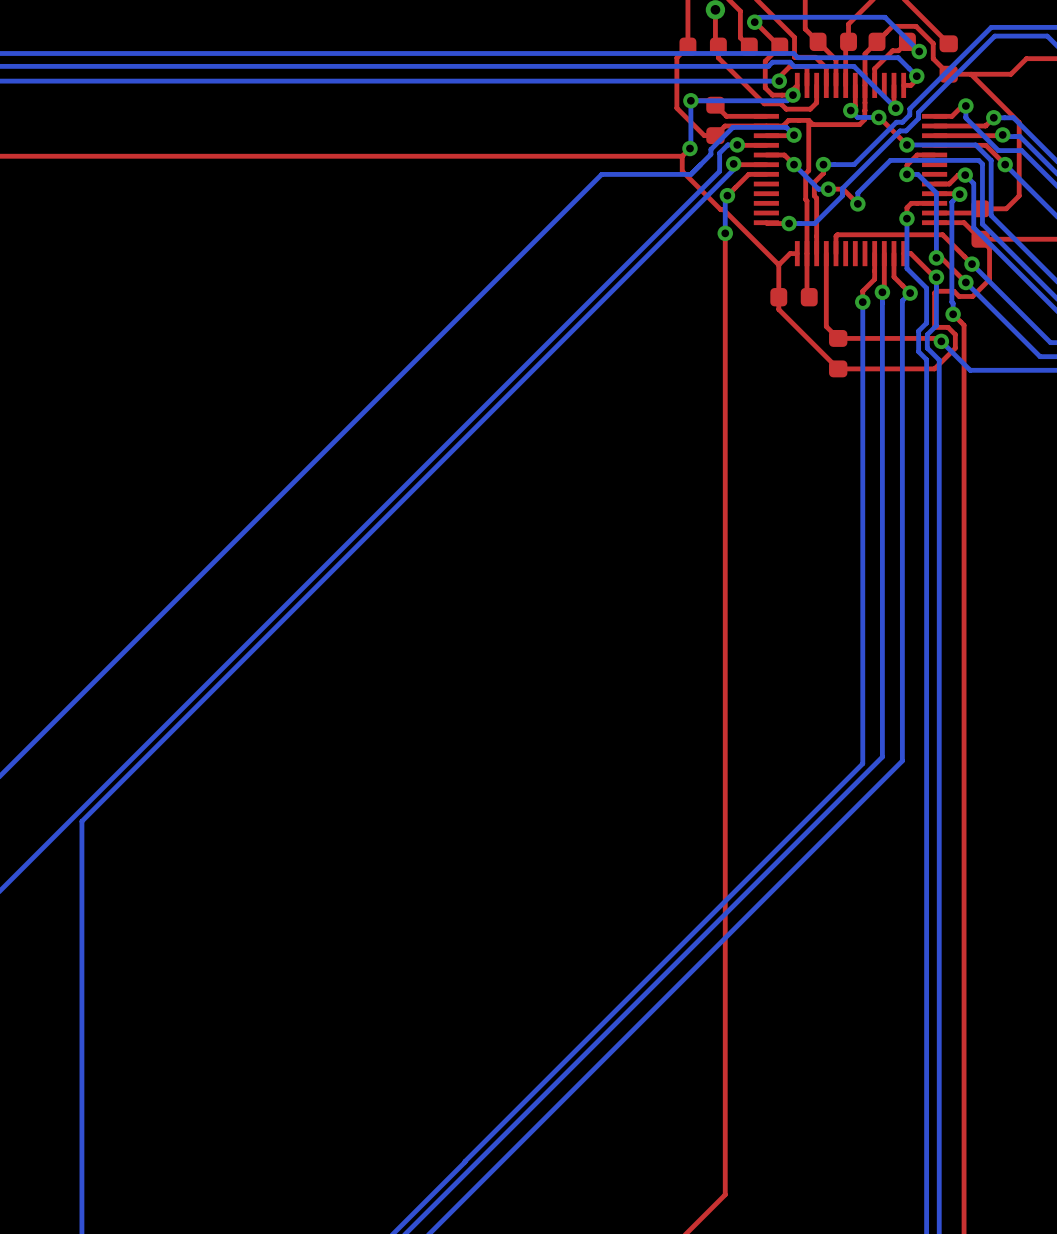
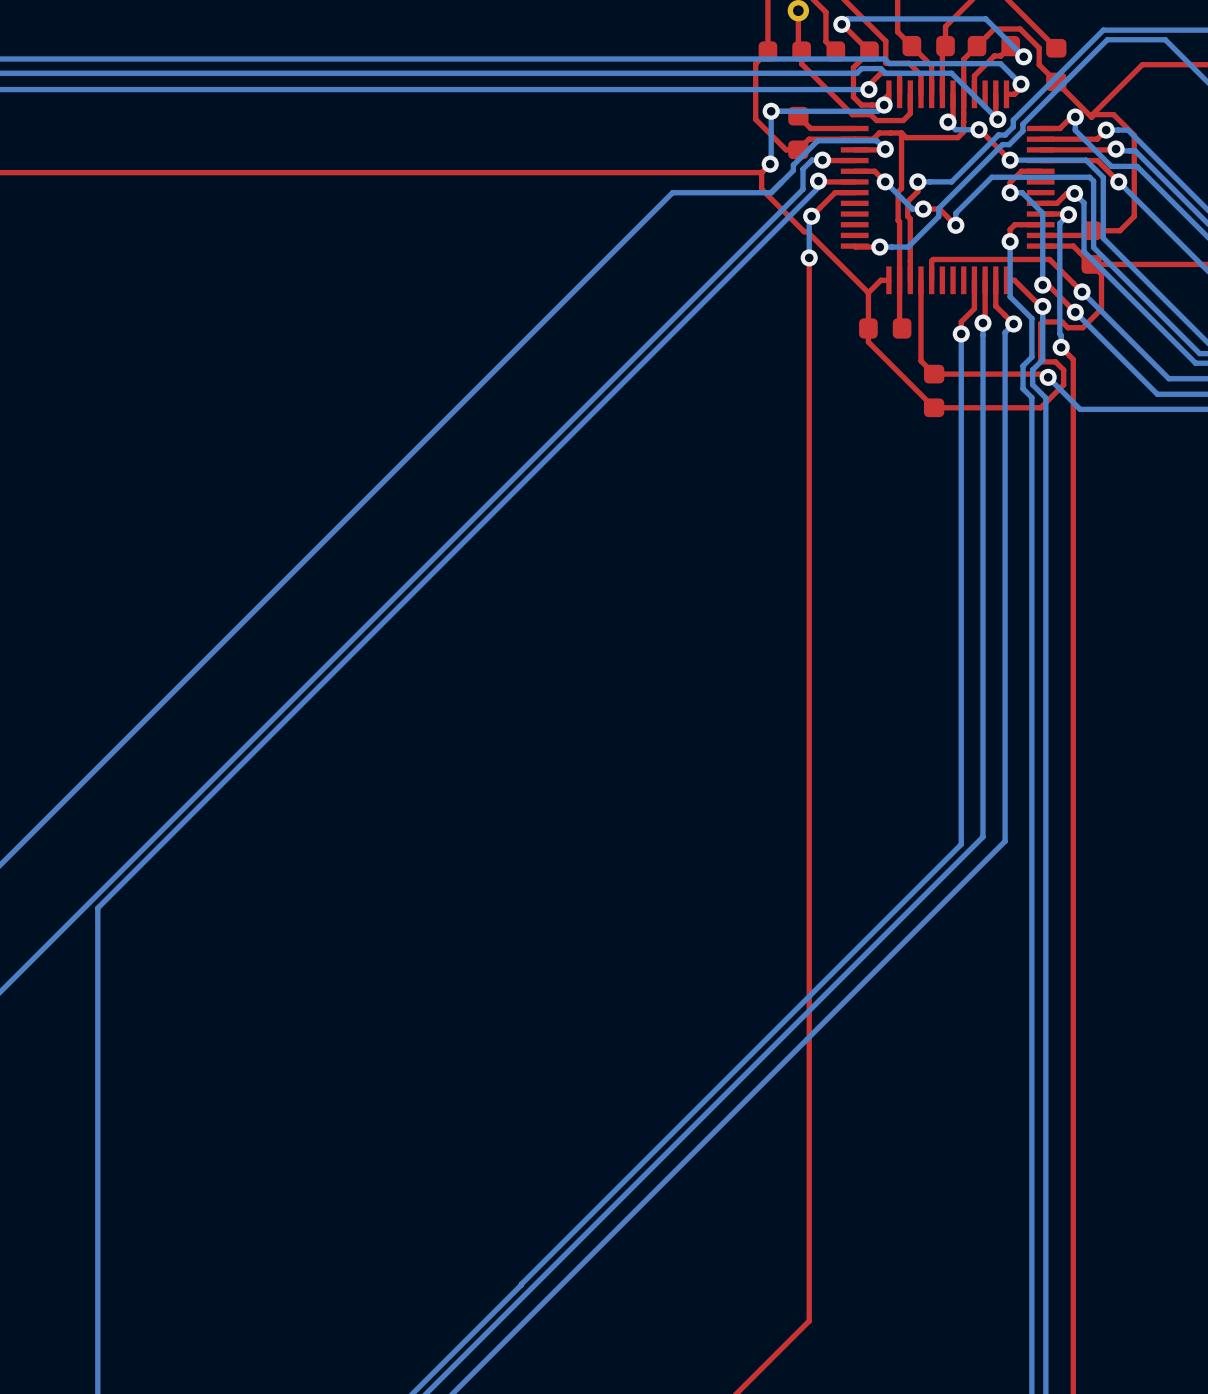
top track: (970, 74) (1000, 103) -> (1091, 117) (1094, 114) (1113, 114)
top track: (1010, 74) (948, 74) -> (1091, 117) (1056, 81)
top track: none -> (1125, 81) (1091, 117)

